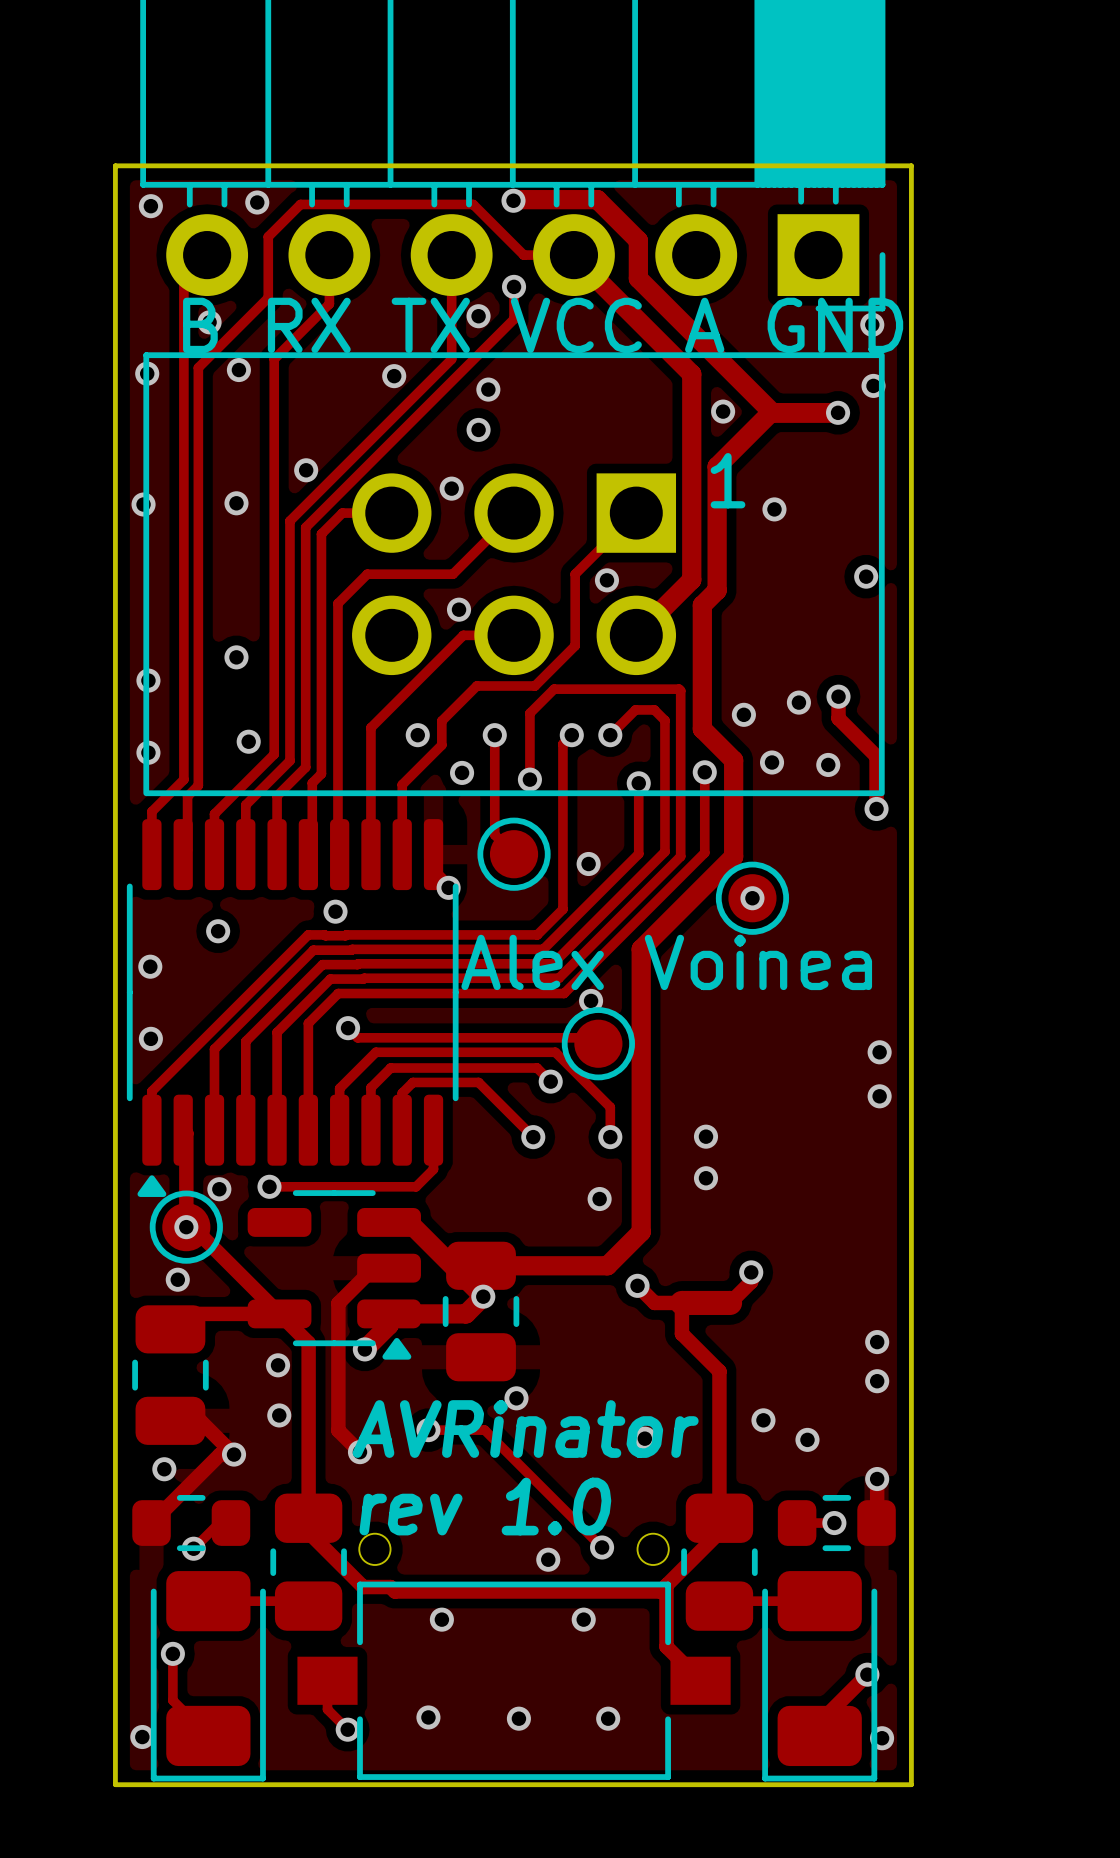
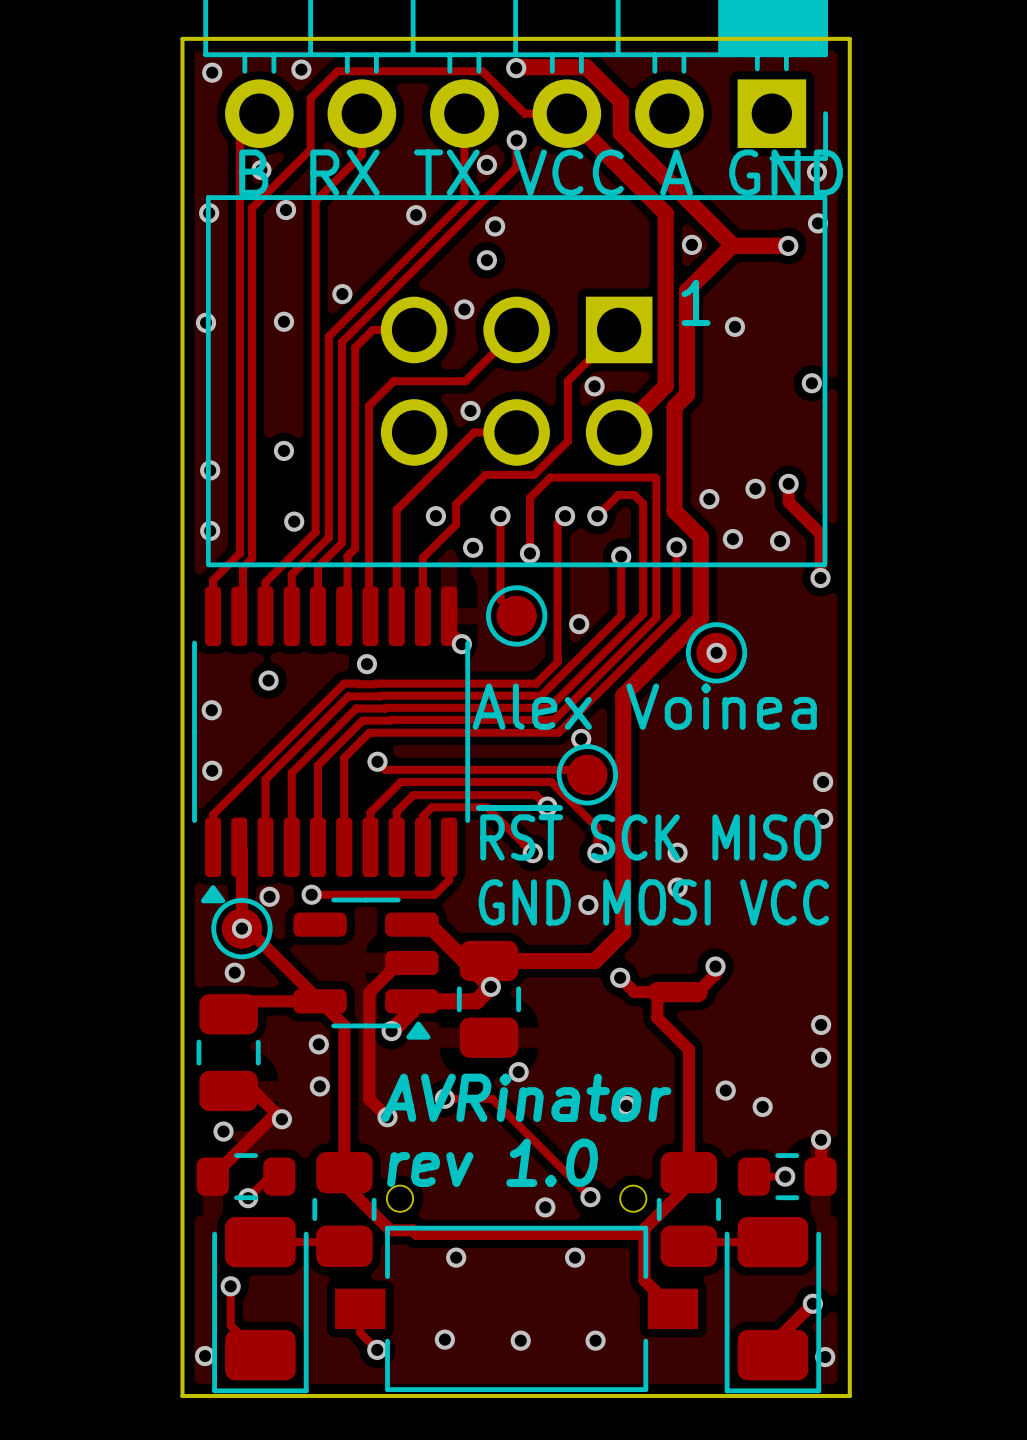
text: none -> ~{RST} SCK MISO (648, 832)
text: none -> GND MOSI VCC (653, 902)

